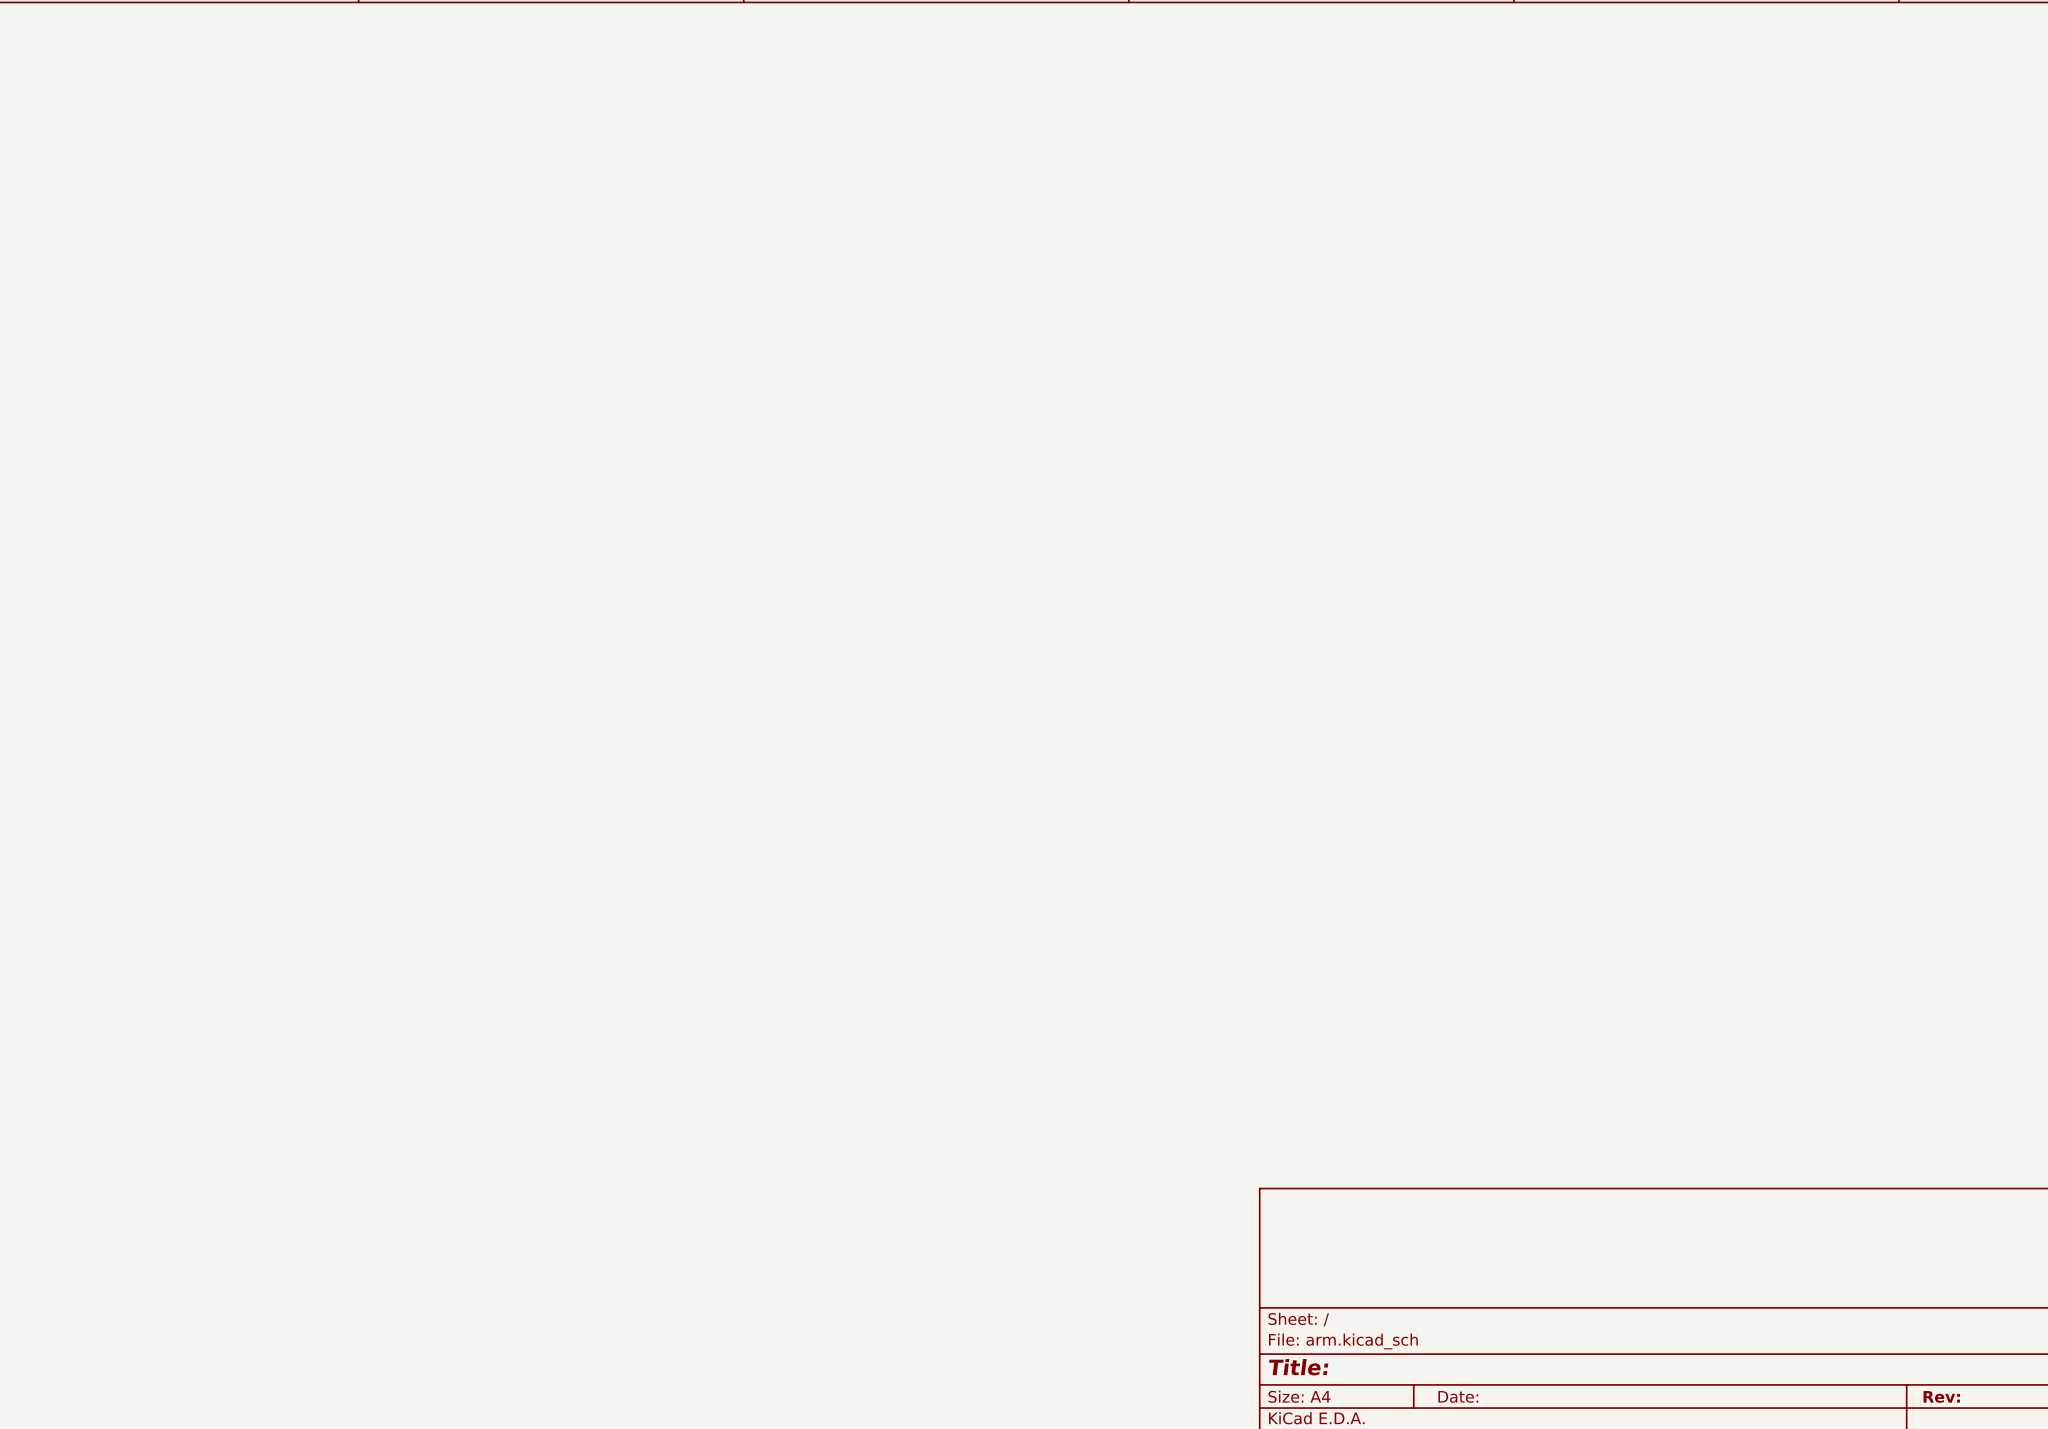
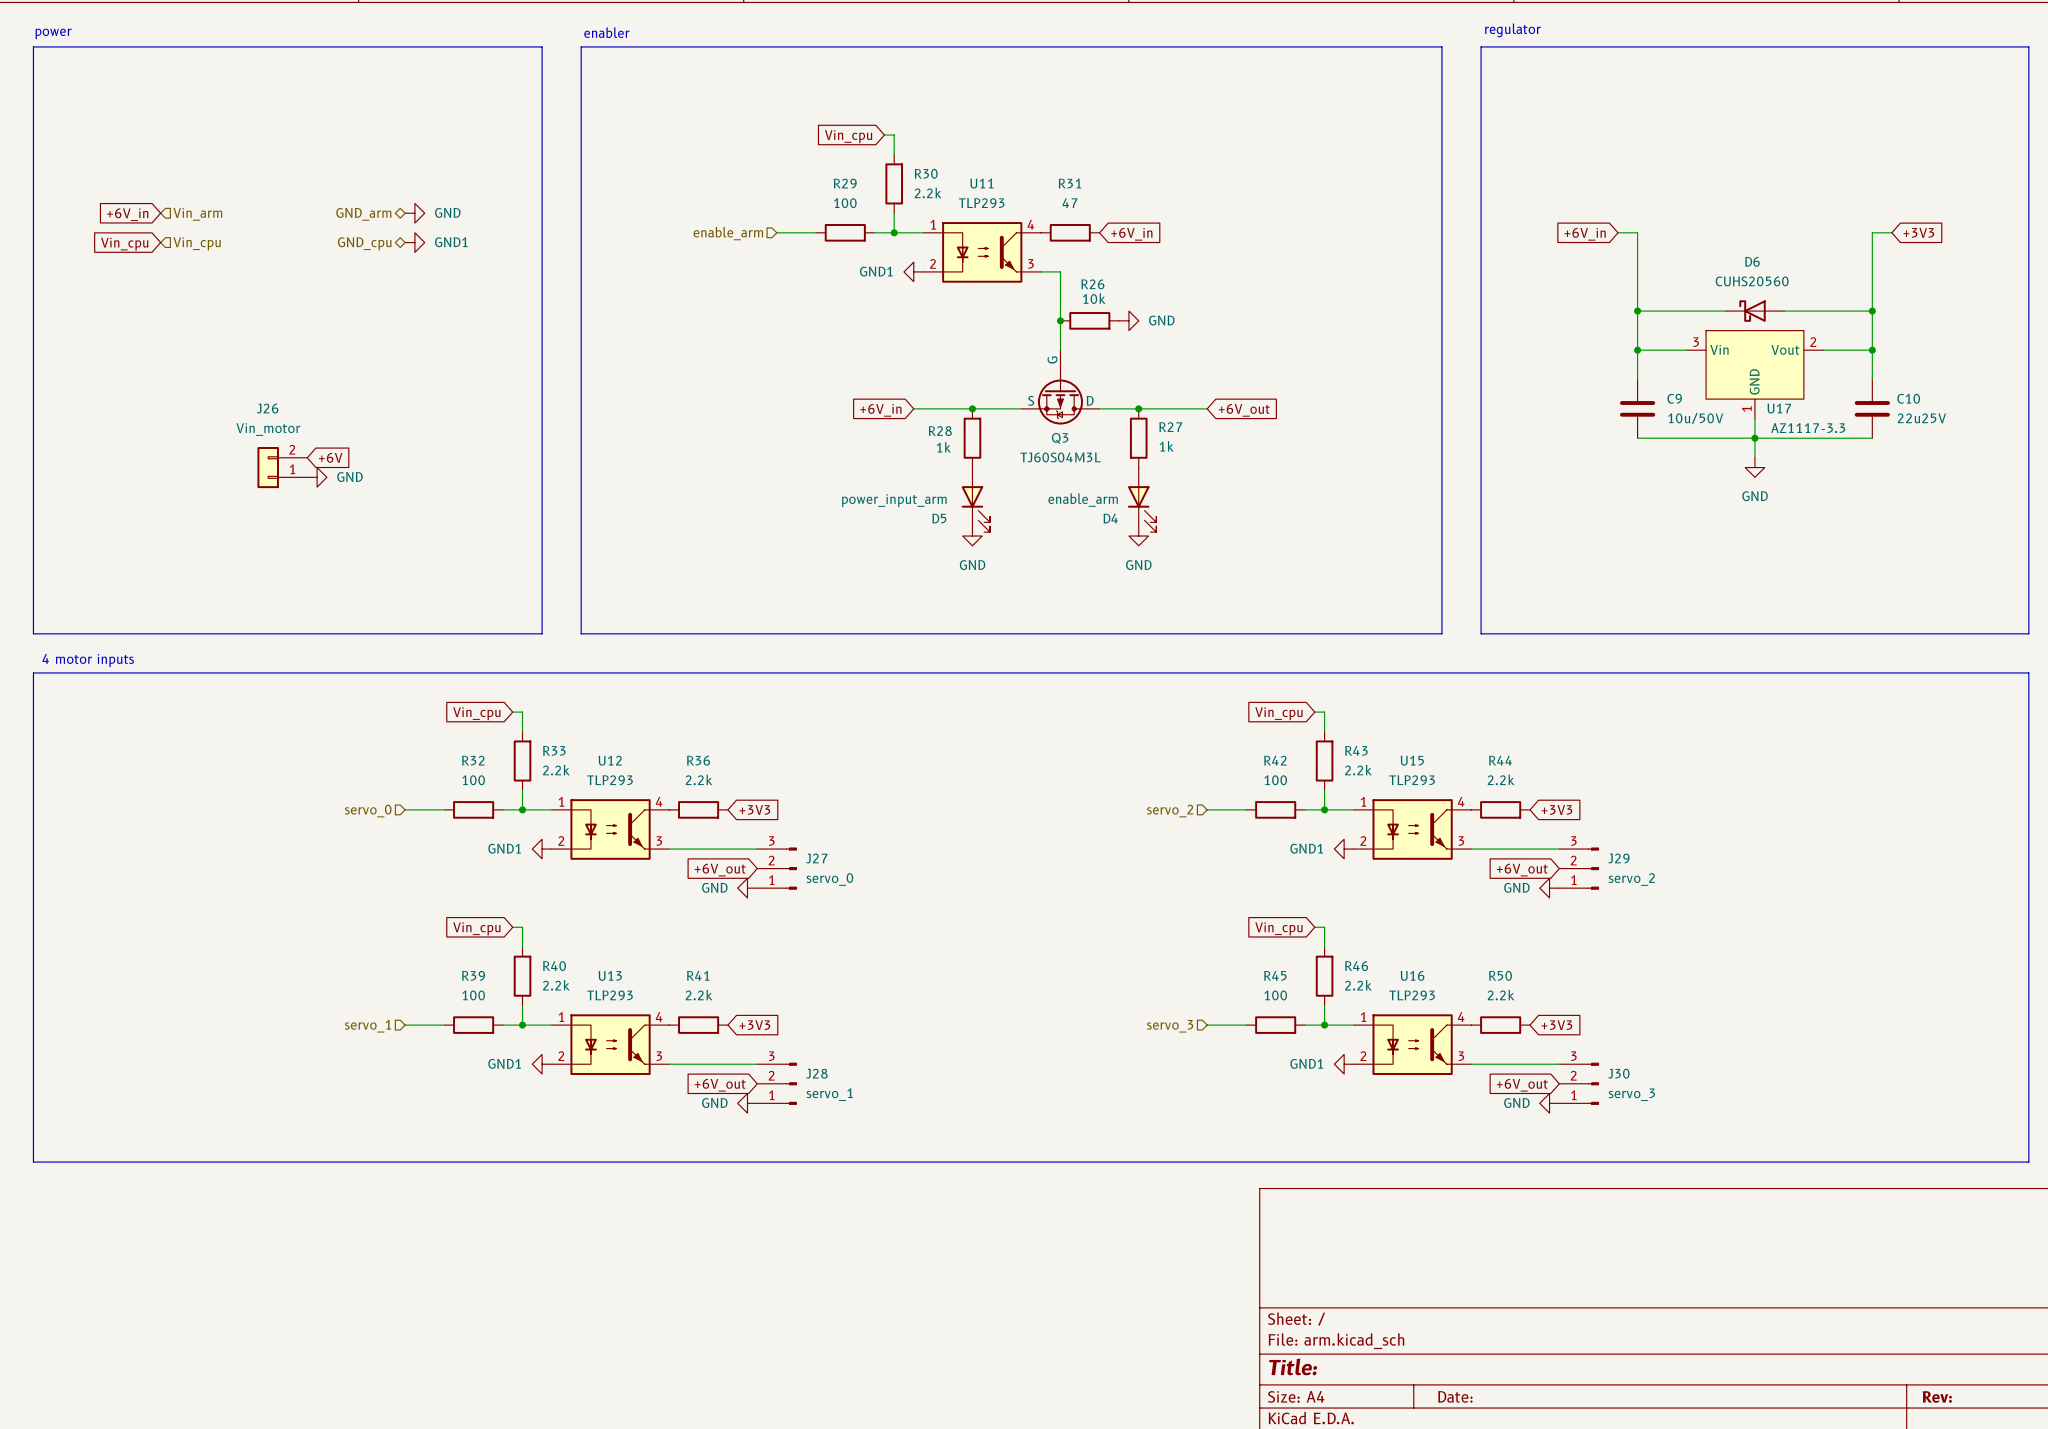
text: none -> regulator (1513, 30)
text: none -> enabler (606, 32)
text: none -> power (53, 33)
line: none -> (33, 46) (542, 46) (542, 633) (33, 633) (33, 46)
line: none -> (581, 46) (1441, 46) (1441, 633) (581, 633) (581, 46)
line: none -> (1481, 46) (2028, 46) (2028, 633) (1481, 633) (1481, 46)
wire: none -> (884, 135) (894, 135) (894, 154)
global label: none -> Vin_cpu (848, 136)
R30: none -> 2.2k (894, 183)
power symbol: none -> GND (414, 213)
wire: none -> (894, 213) (894, 232)
global label: none -> +6V_in (127, 214)
hierarchical label: none -> Vin_arm (197, 214)
hierarchical label: none -> GND_arm (363, 214)
wire: none -> (776, 232) (815, 232)
R29: none -> 100 (845, 232)
wire: none -> (874, 232) (923, 232)
junction: none -> (894, 232)
R31: none -> 47 (1070, 232)
wire: none -> (1618, 232) (1637, 232) (1637, 379)
wire: none -> (1891, 232) (1872, 232) (1872, 379)
global label: none -> +3V3 (1918, 232)
hierarchical label: none -> enable_arm (728, 233)
global label: none -> +6V_in (1131, 234)
global label: none -> +6V_in (1585, 234)
power symbol: none -> GND1 (414, 242)
global label: none -> Vin_cpu (124, 244)
hierarchical label: none -> Vin_cpu (197, 243)
hierarchical label: none -> GND_cpu (364, 243)
U11: none -> TLP293 (982, 252)
power symbol: none -> GND1 (913, 271)
wire: none -> (1040, 271) (1060, 271) (1060, 350)
wire: none -> (1637, 311) (1725, 311)
junction: none -> (1637, 311)
D6: none -> CUHS20560 (1754, 311)
wire: none -> (1784, 311) (1872, 311)
junction: none -> (1872, 311)
junction: none -> (1060, 320)
R26: none -> 10k (1089, 320)
power symbol: none -> GND (1128, 320)
wire: none -> (1637, 350) (1686, 350)
junction: none -> (1637, 350)
wire: none -> (1823, 350) (1872, 350)
junction: none -> (1872, 350)
U17: none -> AZ1117-3.3 (1754, 374)
Q3: none -> TJ60S04M3L (1060, 387)
wire: none -> (913, 408) (1021, 408)
junction: none -> (972, 408)
wire: none -> (1099, 408) (1207, 408)
junction: none -> (1138, 408)
C9: none -> 10u/50V (1637, 408)
C10: none -> 22u25V (1872, 408)
global label: none -> +6V_in (880, 410)
global label: none -> +6V_out (1244, 410)
wire: none -> (1754, 418) (1754, 457)
R28: none -> 1k (972, 438)
R27: none -> 1k (1138, 438)
wire: none -> (1637, 438) (1872, 438)
junction: none -> (1754, 438)
global label: none -> +6V (330, 457)
J26: none -> Vin_motor (282, 467)
power symbol: none -> GND (1754, 467)
power symbol: none -> GND (317, 477)
D5: none -> power_input_arm (975, 499)
D4: none -> enable_arm (1142, 499)
power symbol: none -> GND (972, 536)
power symbol: none -> GND (1138, 536)
text: none -> 4 motor inputs (88, 660)
line: none -> (33, 672) (33, 1162) (2028, 1162) (2028, 672) (33, 672)
wire: none -> (512, 712) (522, 712) (522, 731)
wire: none -> (1314, 712) (1324, 712) (1324, 731)
global label: none -> Vin_cpu (476, 713)
global label: none -> Vin_cpu (1278, 713)
R33: none -> 2.2k (522, 761)
R43: none -> 2.2k (1324, 761)
wire: none -> (522, 790) (522, 809)
wire: none -> (1324, 790) (1324, 809)
wire: none -> (405, 809) (444, 809)
R32: none -> 100 (473, 809)
wire: none -> (502, 809) (551, 809)
junction: none -> (522, 809)
R36: none -> 2.2k (698, 809)
global label: none -> +3V3 (754, 809)
wire: none -> (1207, 809) (1246, 809)
R42: none -> 100 (1275, 809)
wire: none -> (1305, 809) (1353, 809)
junction: none -> (1324, 809)
R44: none -> 2.2k (1500, 809)
global label: none -> +3V3 (1556, 809)
hierarchical label: none -> servo_0 (368, 811)
hierarchical label: none -> servo_2 (1170, 811)
U12: none -> TLP293 (610, 829)
U15: none -> TLP293 (1412, 829)
power symbol: none -> GND1 (542, 849)
wire: none -> (669, 849) (757, 849)
power symbol: none -> GND1 (1344, 849)
wire: none -> (1471, 849) (1559, 849)
J27: none -> servo_0 (777, 868)
J29: none -> servo_2 (1579, 868)
global label: none -> +6V_out (720, 870)
global label: none -> +6V_out (1522, 870)
power symbol: none -> GND (747, 888)
power symbol: none -> GND (1549, 888)
wire: none -> (512, 927) (522, 927) (522, 946)
wire: none -> (1314, 927) (1324, 927) (1324, 946)
global label: none -> Vin_cpu (476, 928)
global label: none -> Vin_cpu (1278, 928)
R40: none -> 2.2k (522, 976)
R46: none -> 2.2k (1324, 976)
wire: none -> (522, 1005) (522, 1025)
wire: none -> (1324, 1005) (1324, 1025)
wire: none -> (405, 1025) (444, 1025)
R39: none -> 100 (473, 1025)
wire: none -> (502, 1025) (551, 1025)
junction: none -> (522, 1025)
R41: none -> 2.2k (698, 1025)
global label: none -> +3V3 (754, 1025)
wire: none -> (1207, 1025) (1246, 1025)
R45: none -> 100 (1275, 1025)
wire: none -> (1305, 1025) (1353, 1025)
junction: none -> (1324, 1025)
R50: none -> 2.2k (1500, 1025)
global label: none -> +3V3 (1556, 1025)
hierarchical label: none -> servo_1 (367, 1026)
hierarchical label: none -> servo_3 (1170, 1026)
U13: none -> TLP293 (610, 1044)
U16: none -> TLP293 (1412, 1044)
power symbol: none -> GND1 (542, 1064)
wire: none -> (669, 1064) (757, 1064)
power symbol: none -> GND1 (1344, 1064)
wire: none -> (1471, 1064) (1559, 1064)
J28: none -> servo_1 (777, 1083)
J30: none -> servo_3 (1579, 1083)
global label: none -> +6V_out (720, 1085)
global label: none -> +6V_out (1522, 1085)
power symbol: none -> GND (747, 1103)
power symbol: none -> GND (1549, 1103)

